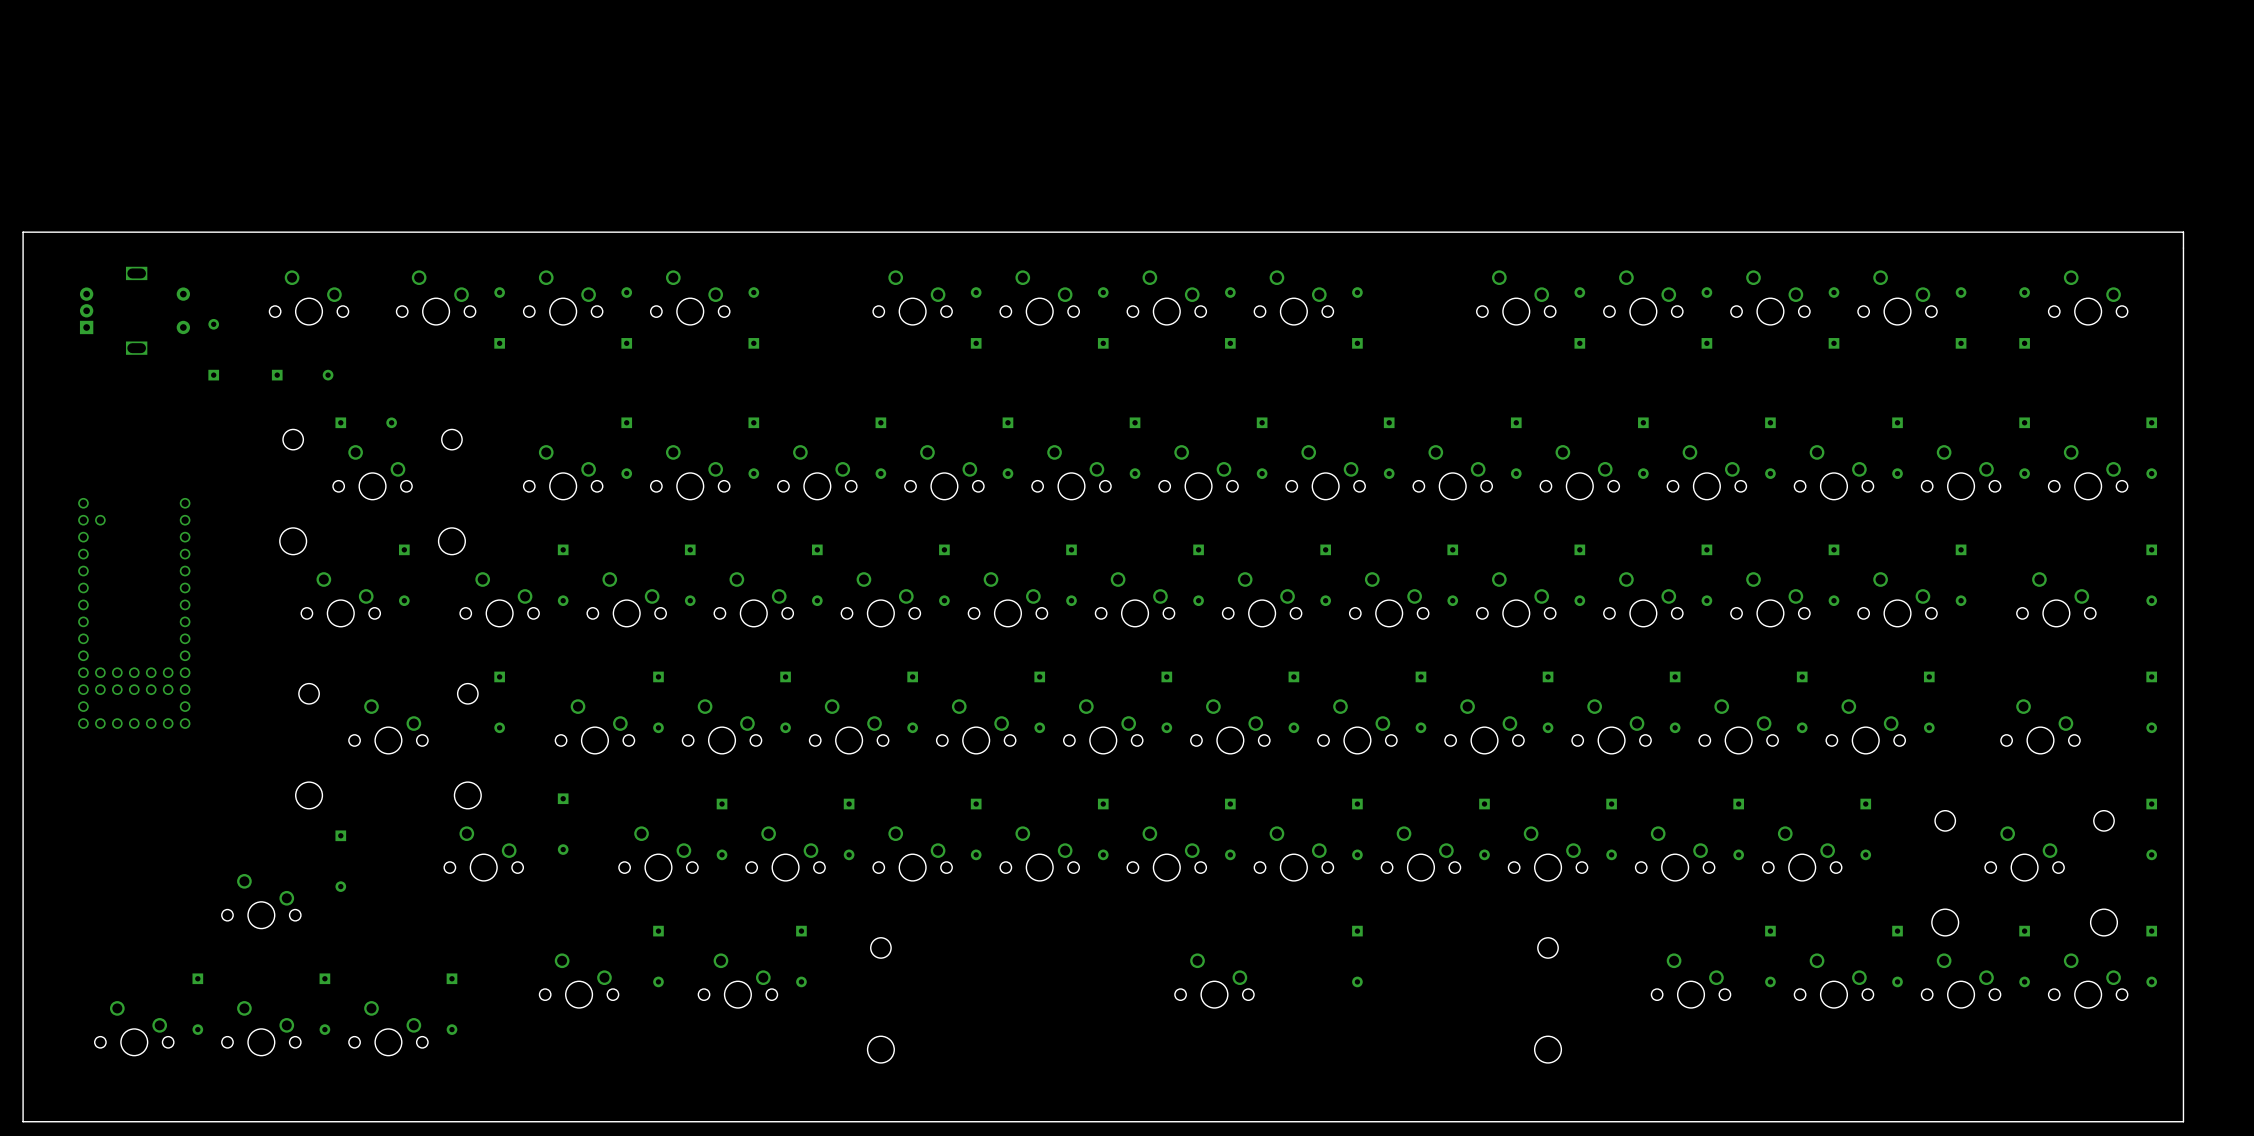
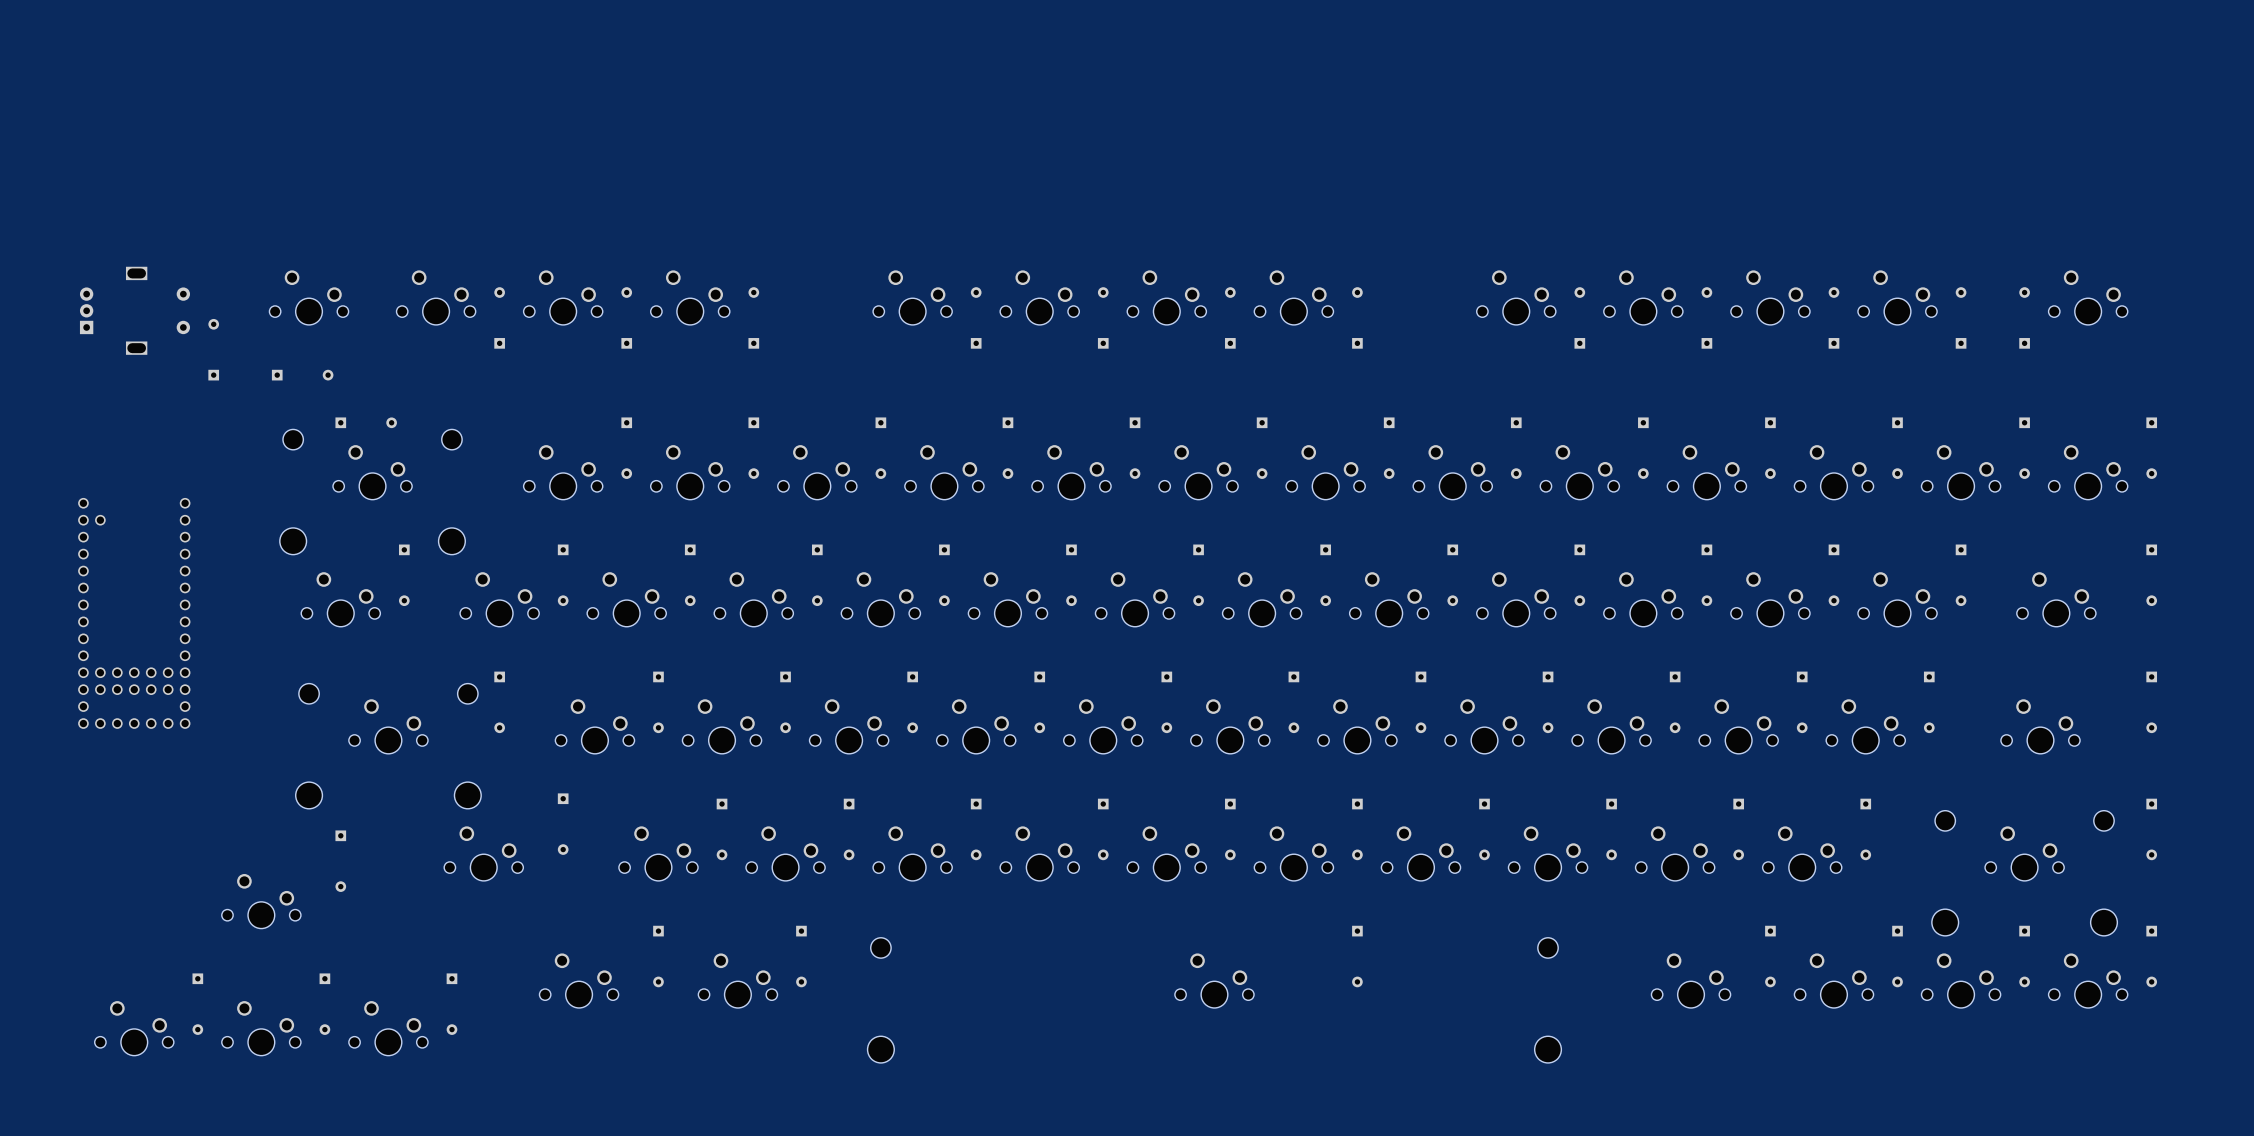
board edge: (2183, 232) (2183, 1121) (23, 1121) (23, 232) (2183, 232) -> none

